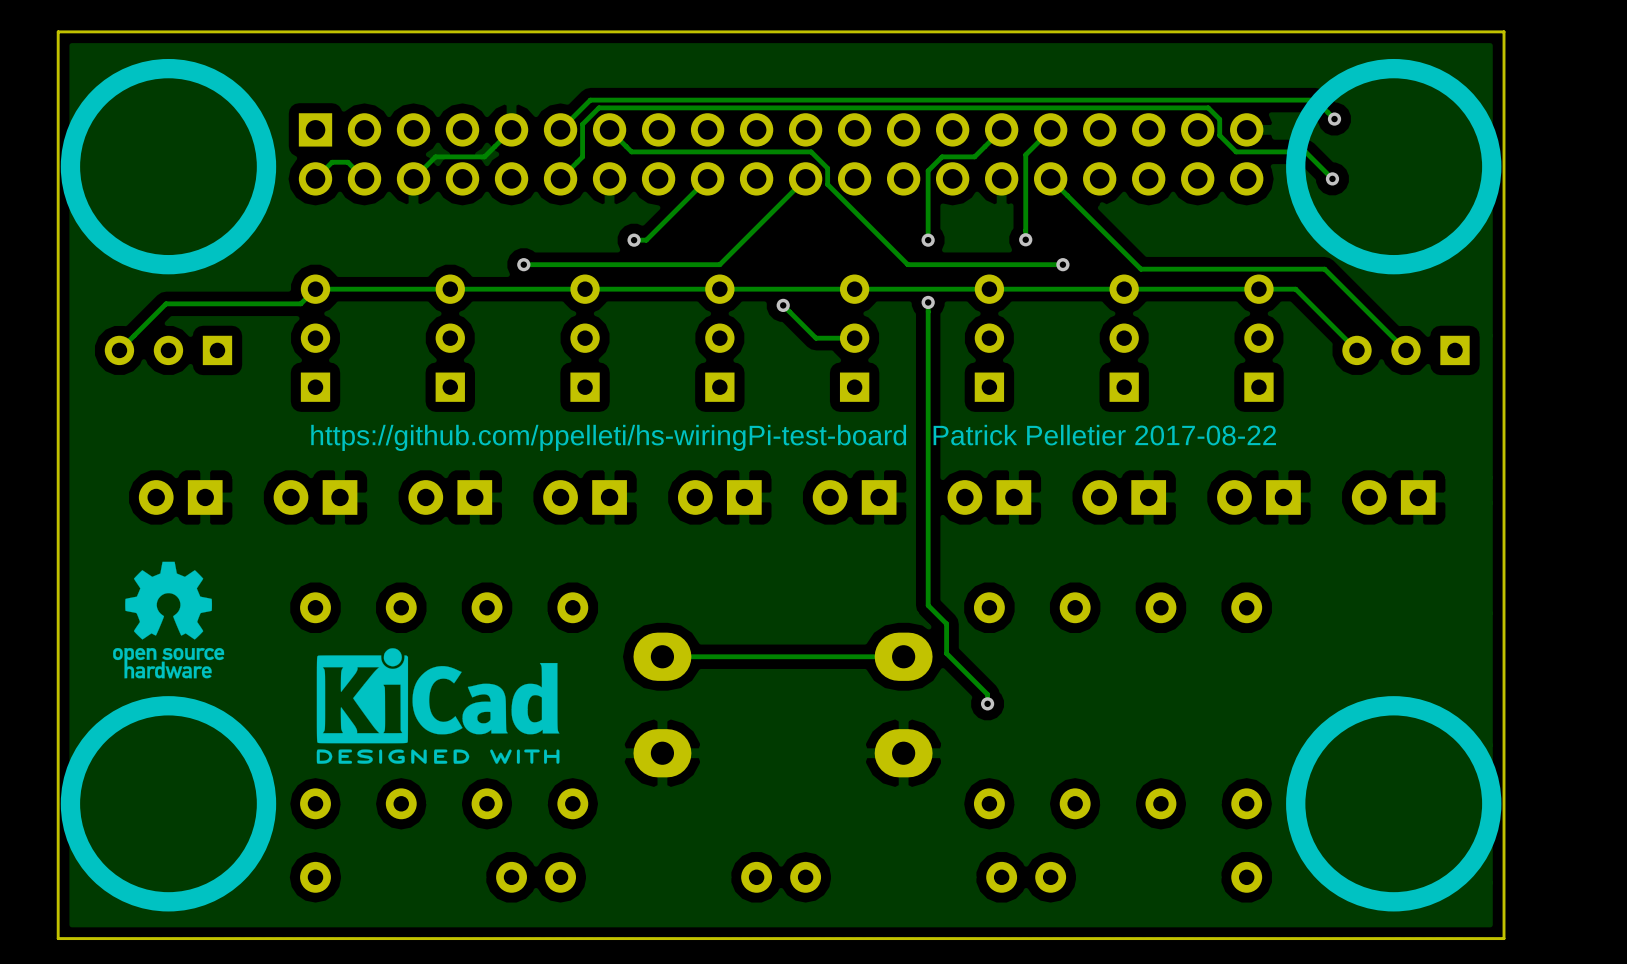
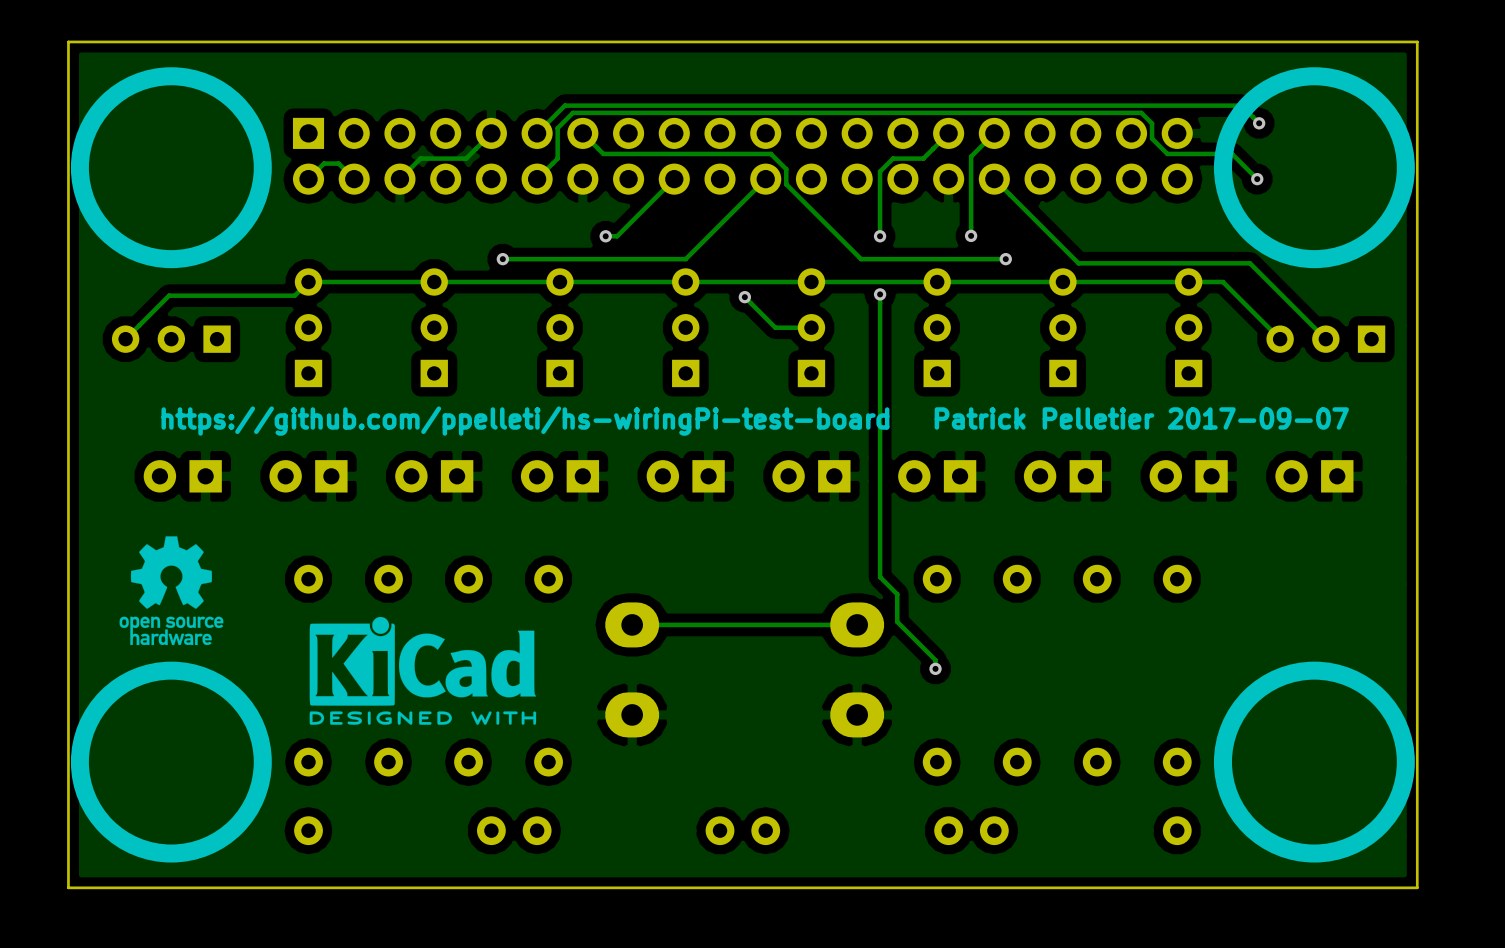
text: https://github.com/ppelleti/hs-wiringPi-test-board Patrick Pelletier 2017-08-22 (793, 437) -> https://github.com/ppelleti/hs-wiringPi-test-board Patrick Pelletier 2017-09-07 (755, 421)

